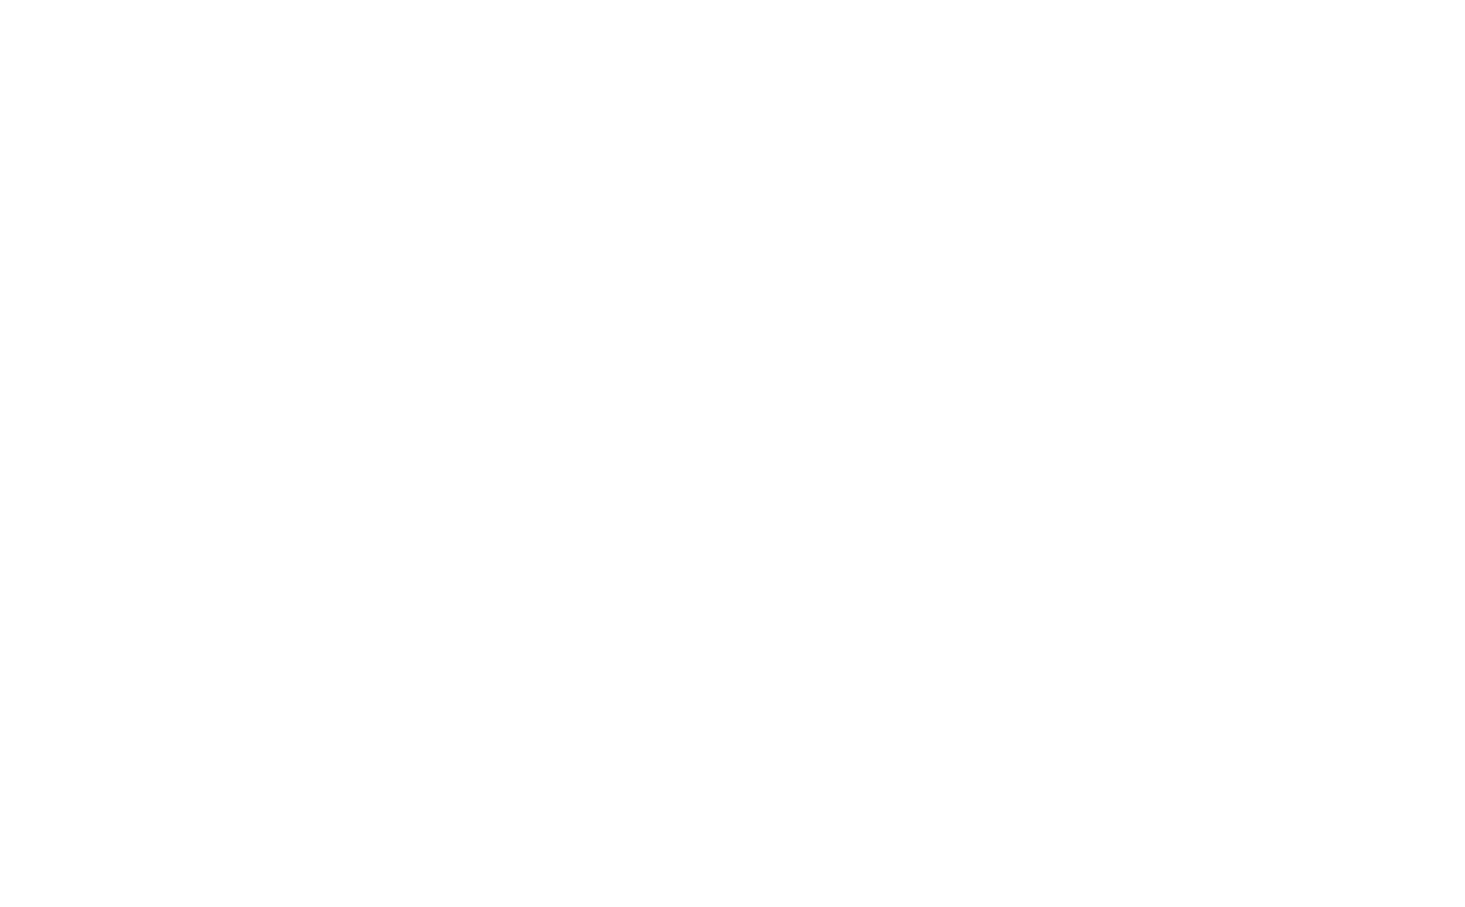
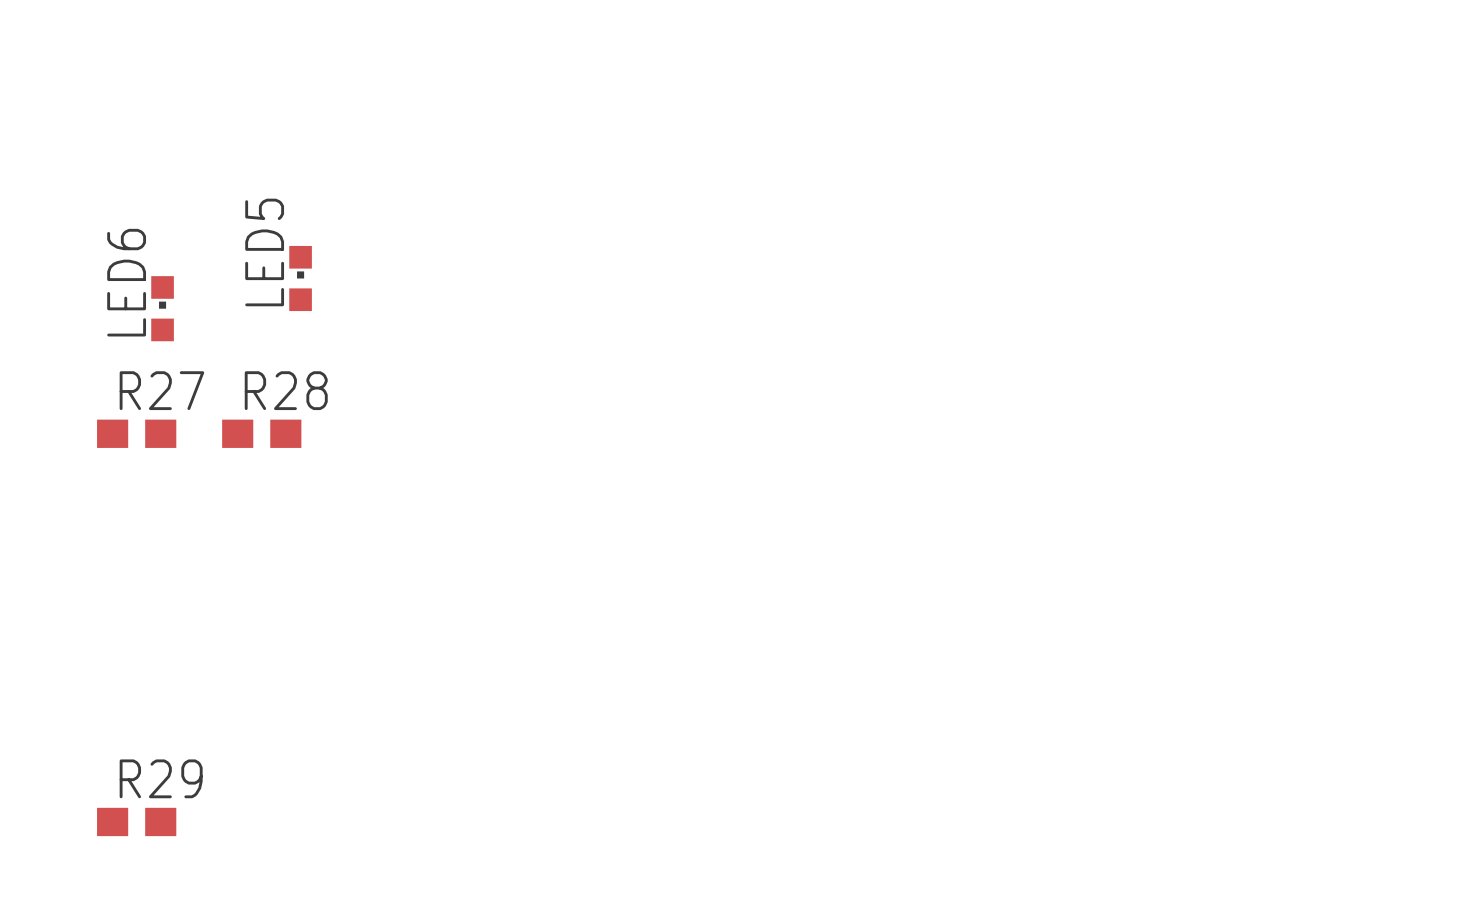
LED5: none -> (300, 278)
LED6: none -> (162, 308)
R27: none -> (136, 433)
R28: none -> (261, 433)
R29: none -> (136, 821)

